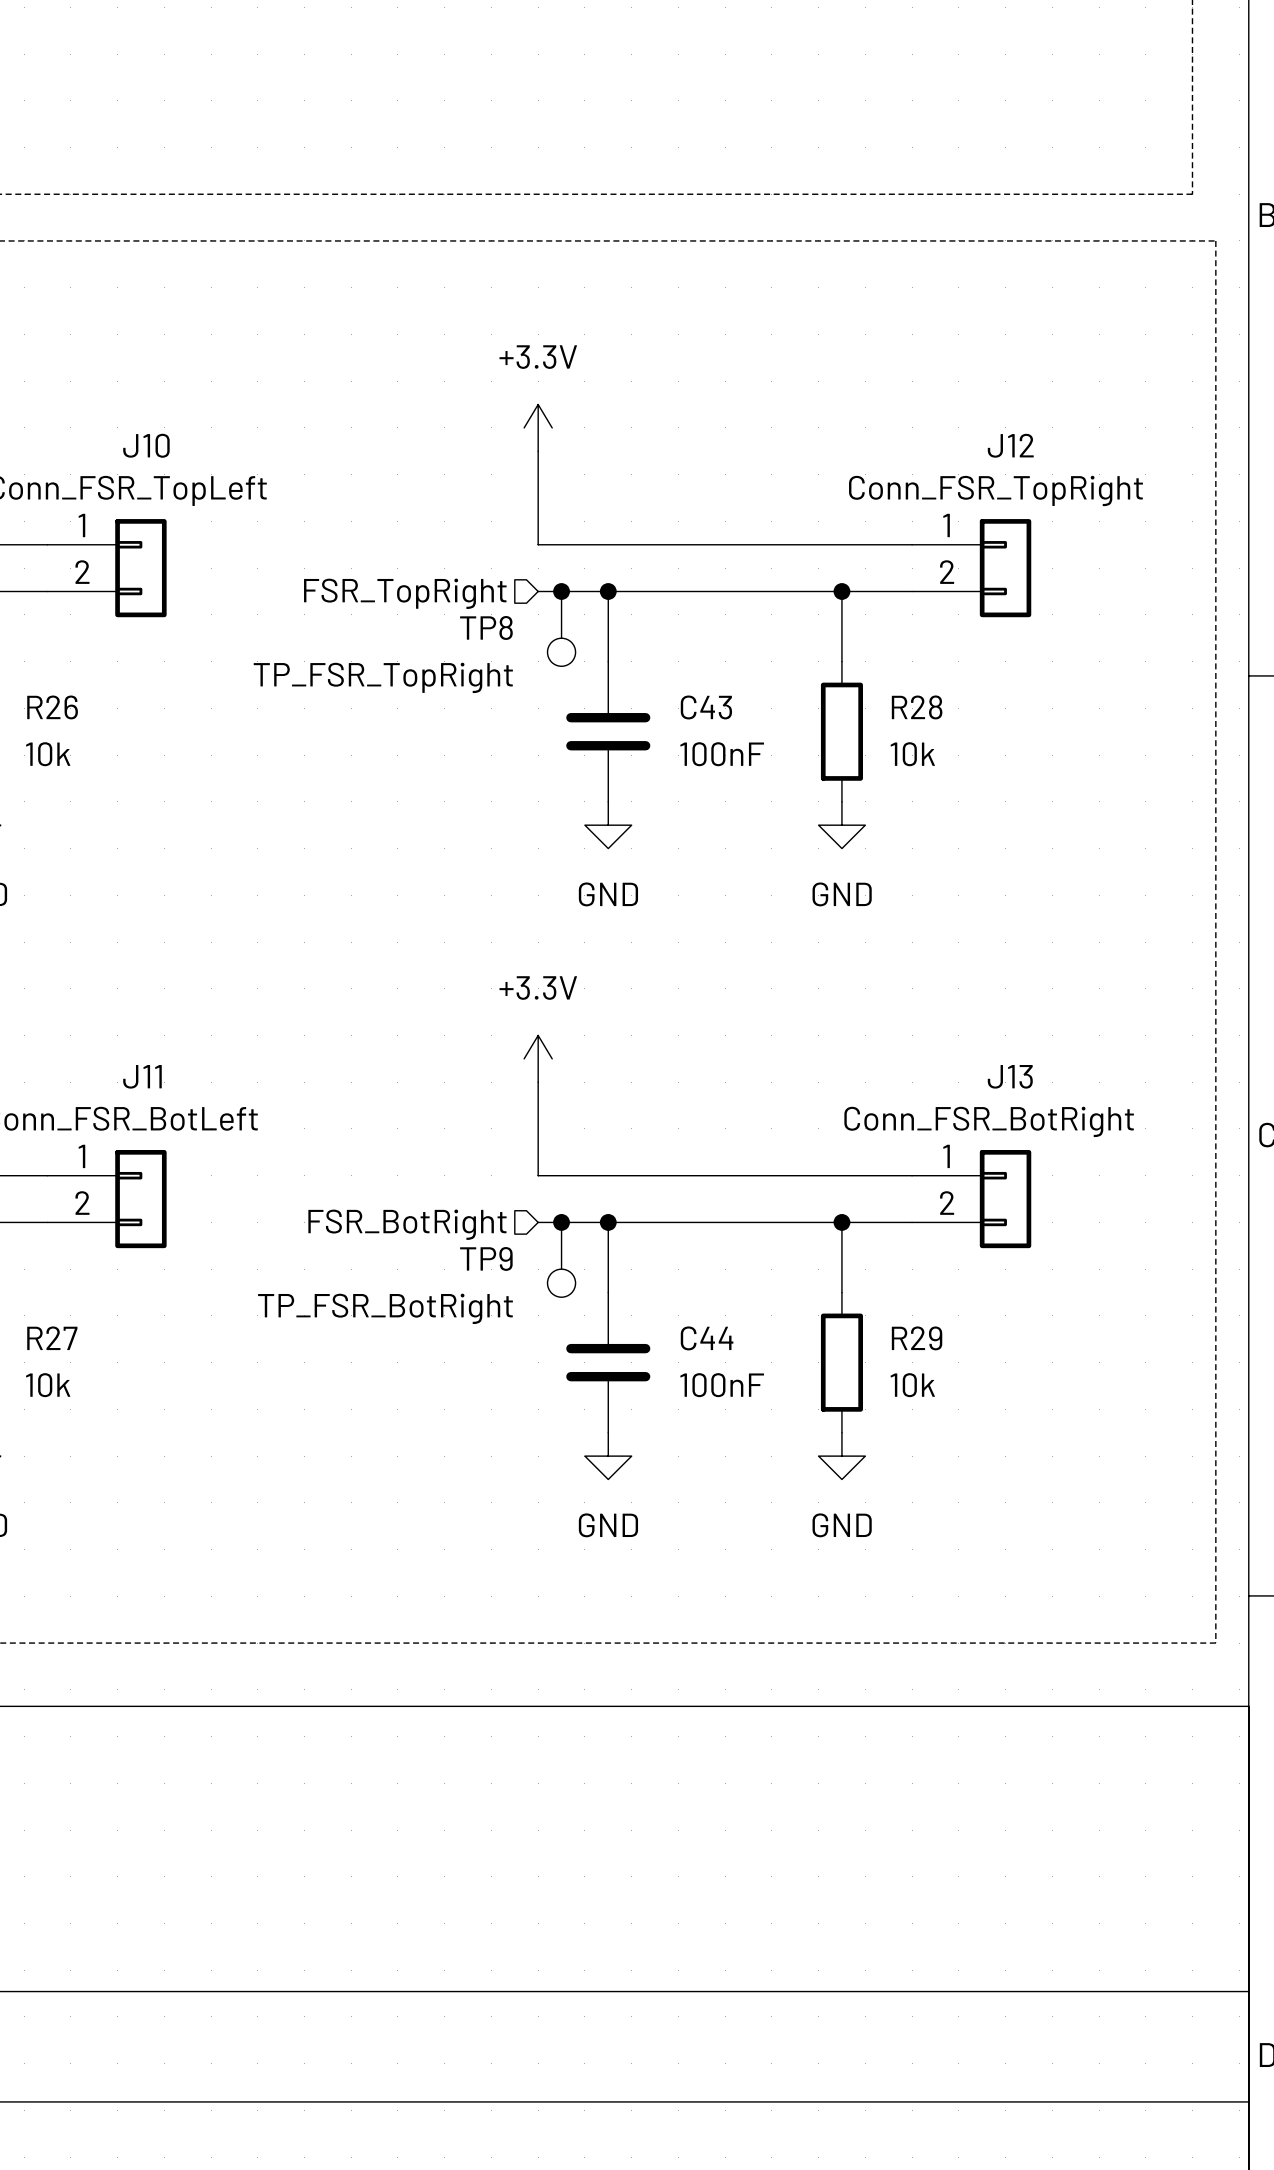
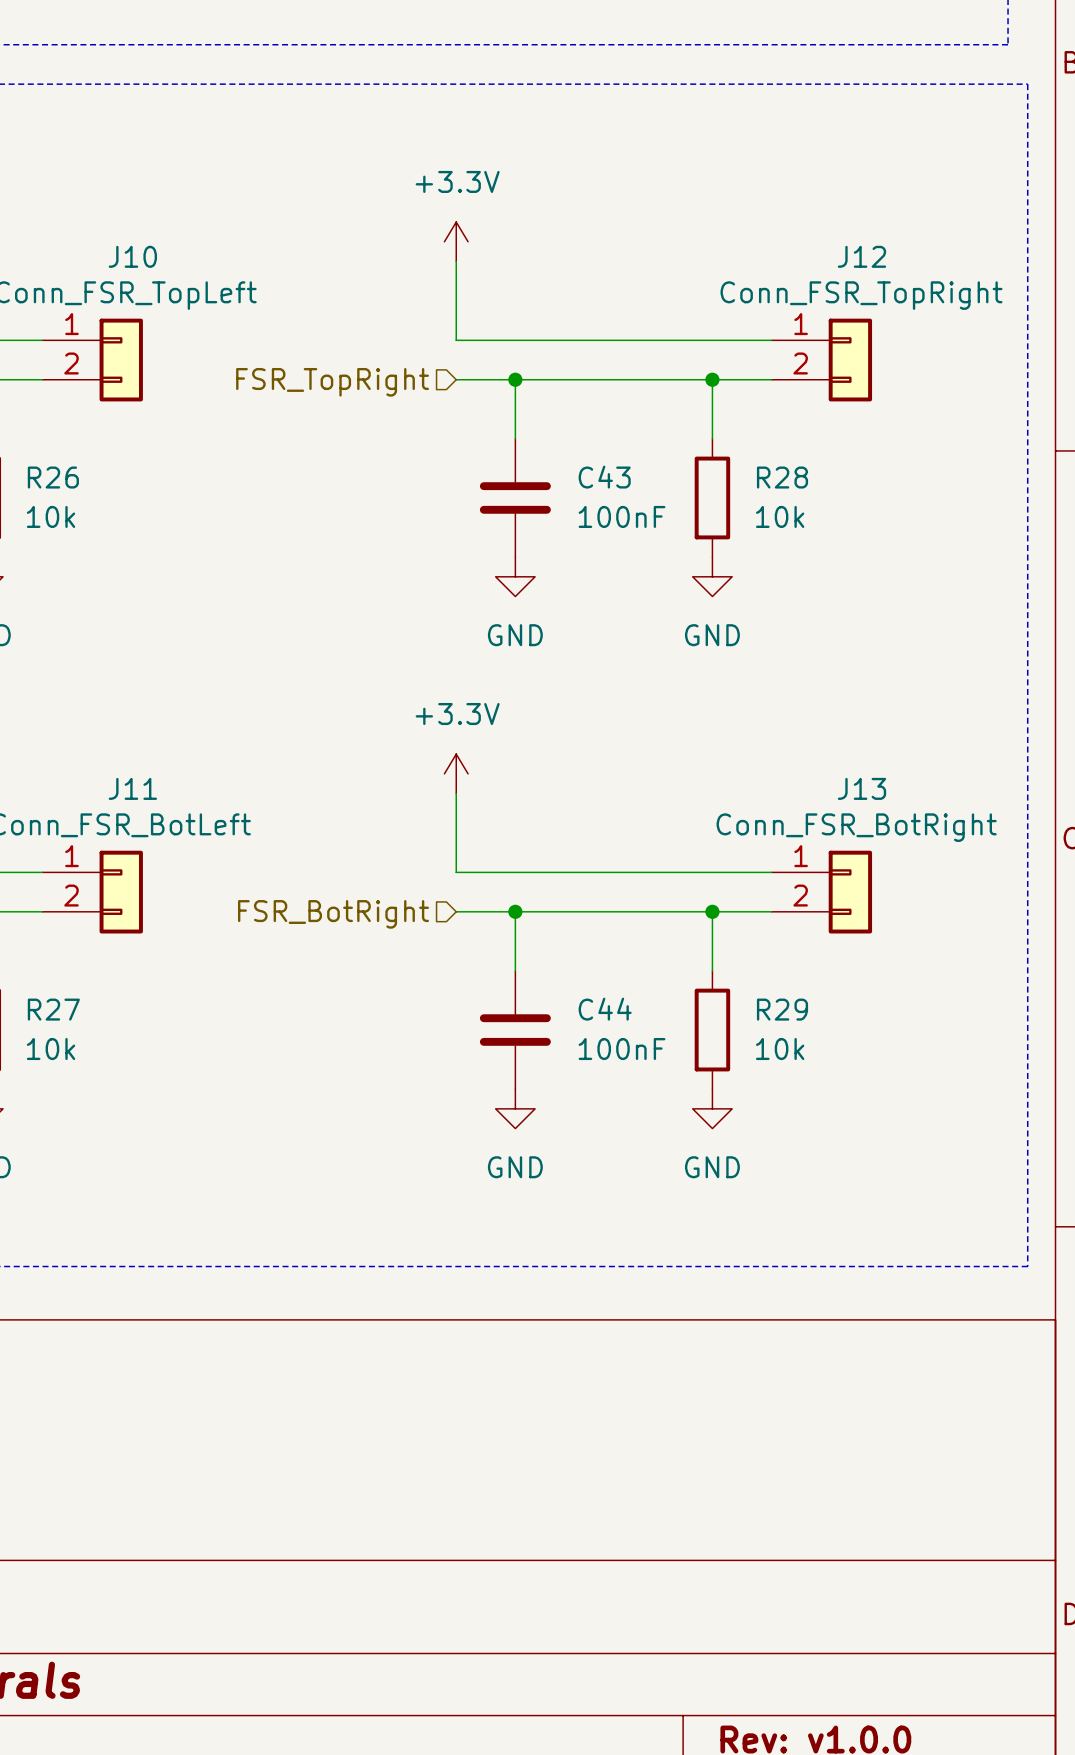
junction: (561, 591) -> none
TP8: TP_FSR_TopRight (561, 628) -> none
junction: (561, 1222) -> none
TP9: TP_FSR_BotRight (561, 1259) -> none

